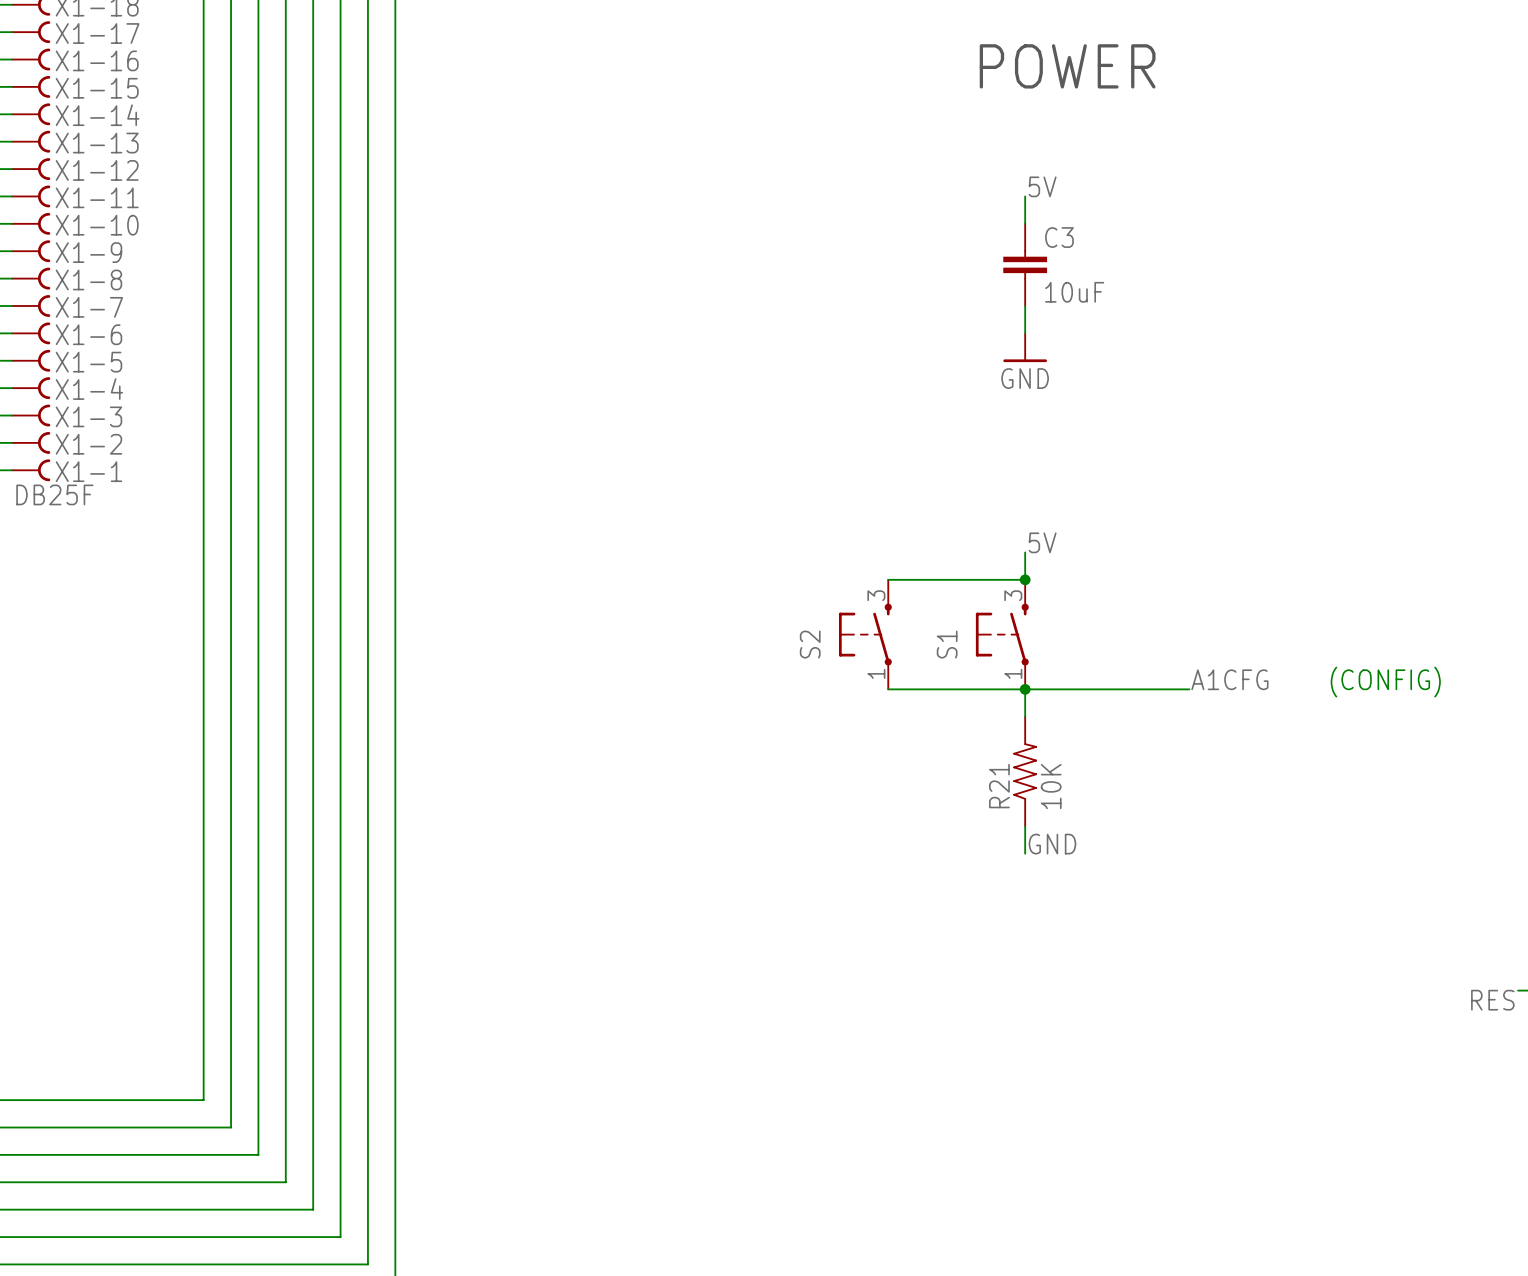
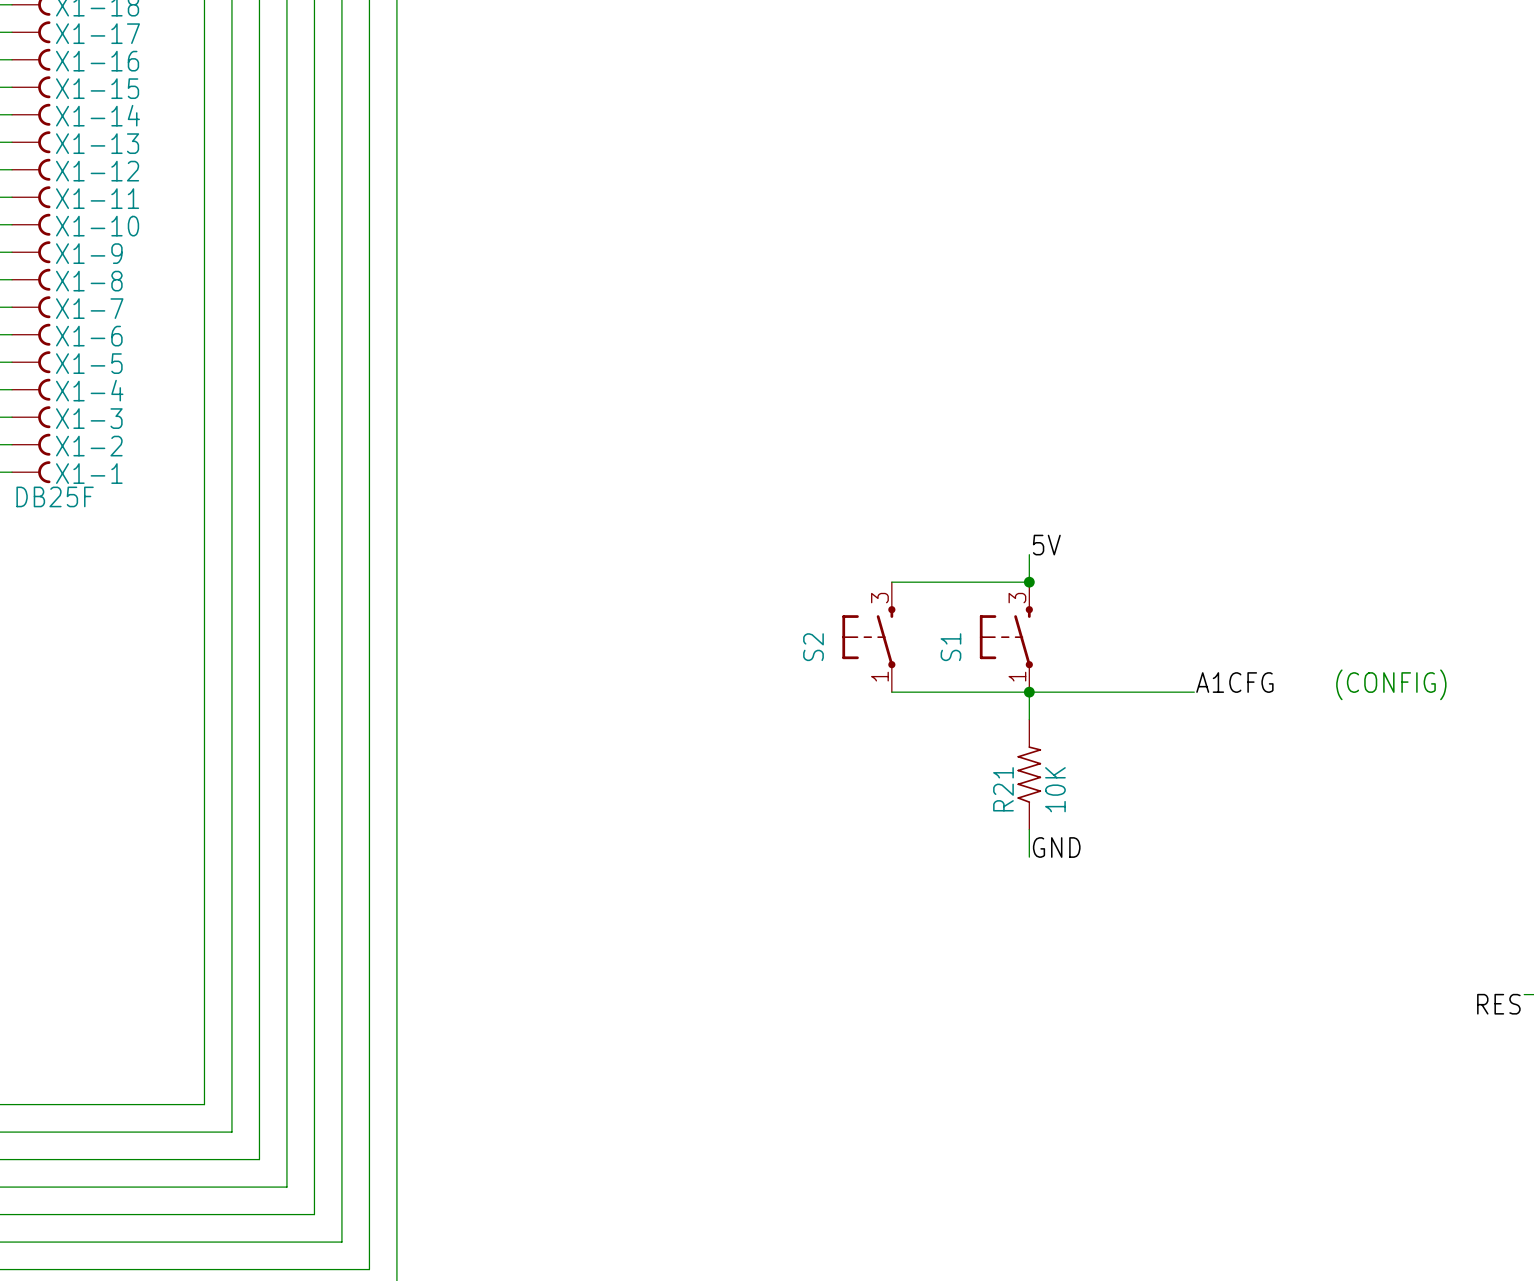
text: POWER (1067, 66) -> none
label: 5V (1042, 186) -> none
wire: (1025, 196) (1025, 223) -> none
C3: 10uF (1025, 264) -> none
wire: (1025, 305) (1025, 333) -> none
power symbol: GND (1025, 347) -> none

